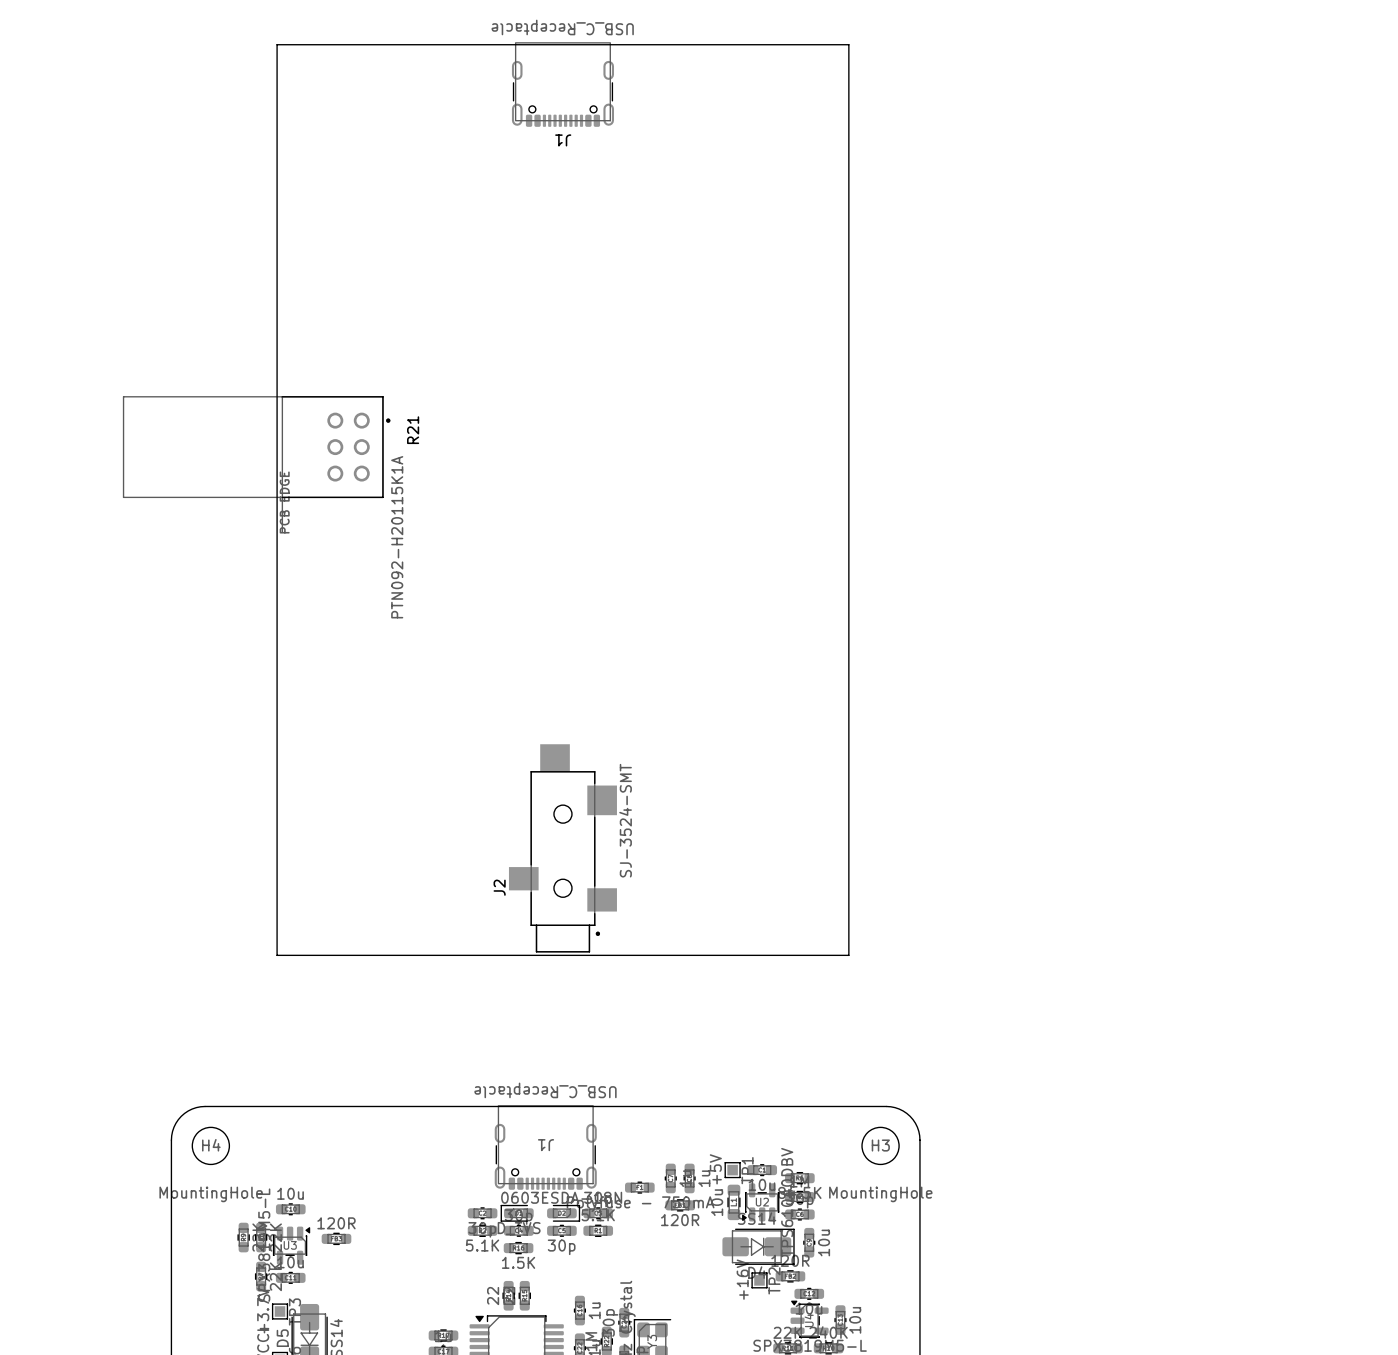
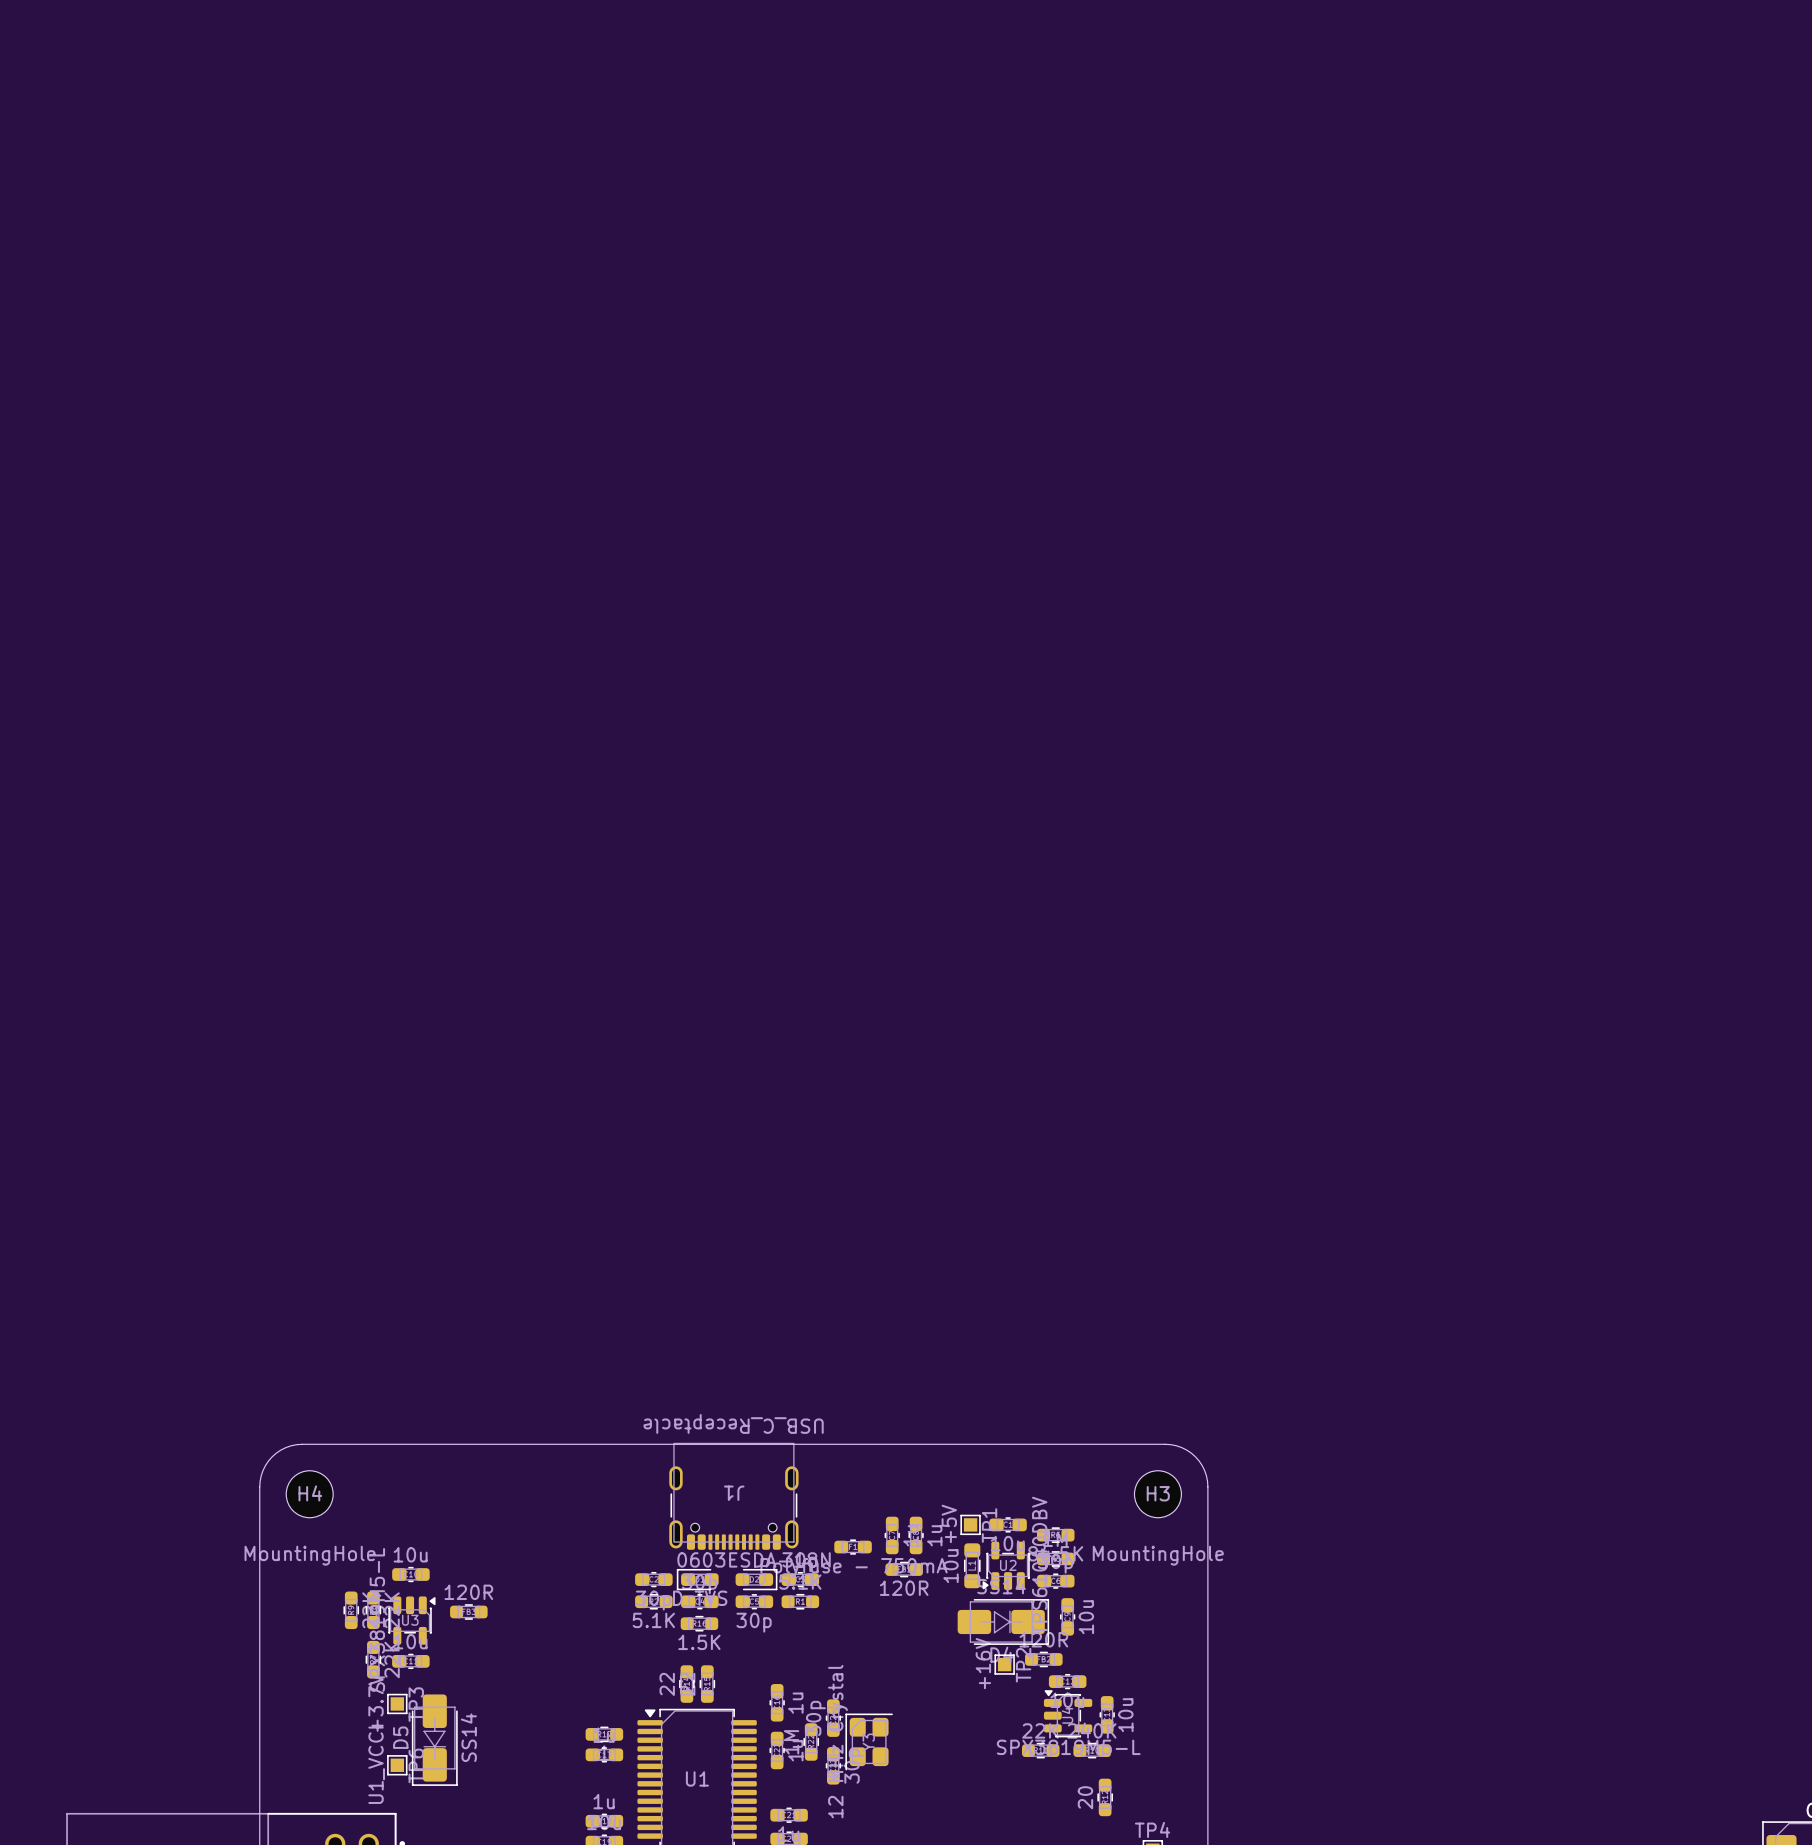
board edge: (277, 44) (848, 44) (848, 955) (277, 955) (277, 44) -> none
J1: USB_C_Receptacle (562, 84) -> none
R21: PTN092-H20115K1A (256, 464) -> none
J2: SJ-3524-SMT (562, 848) -> none

